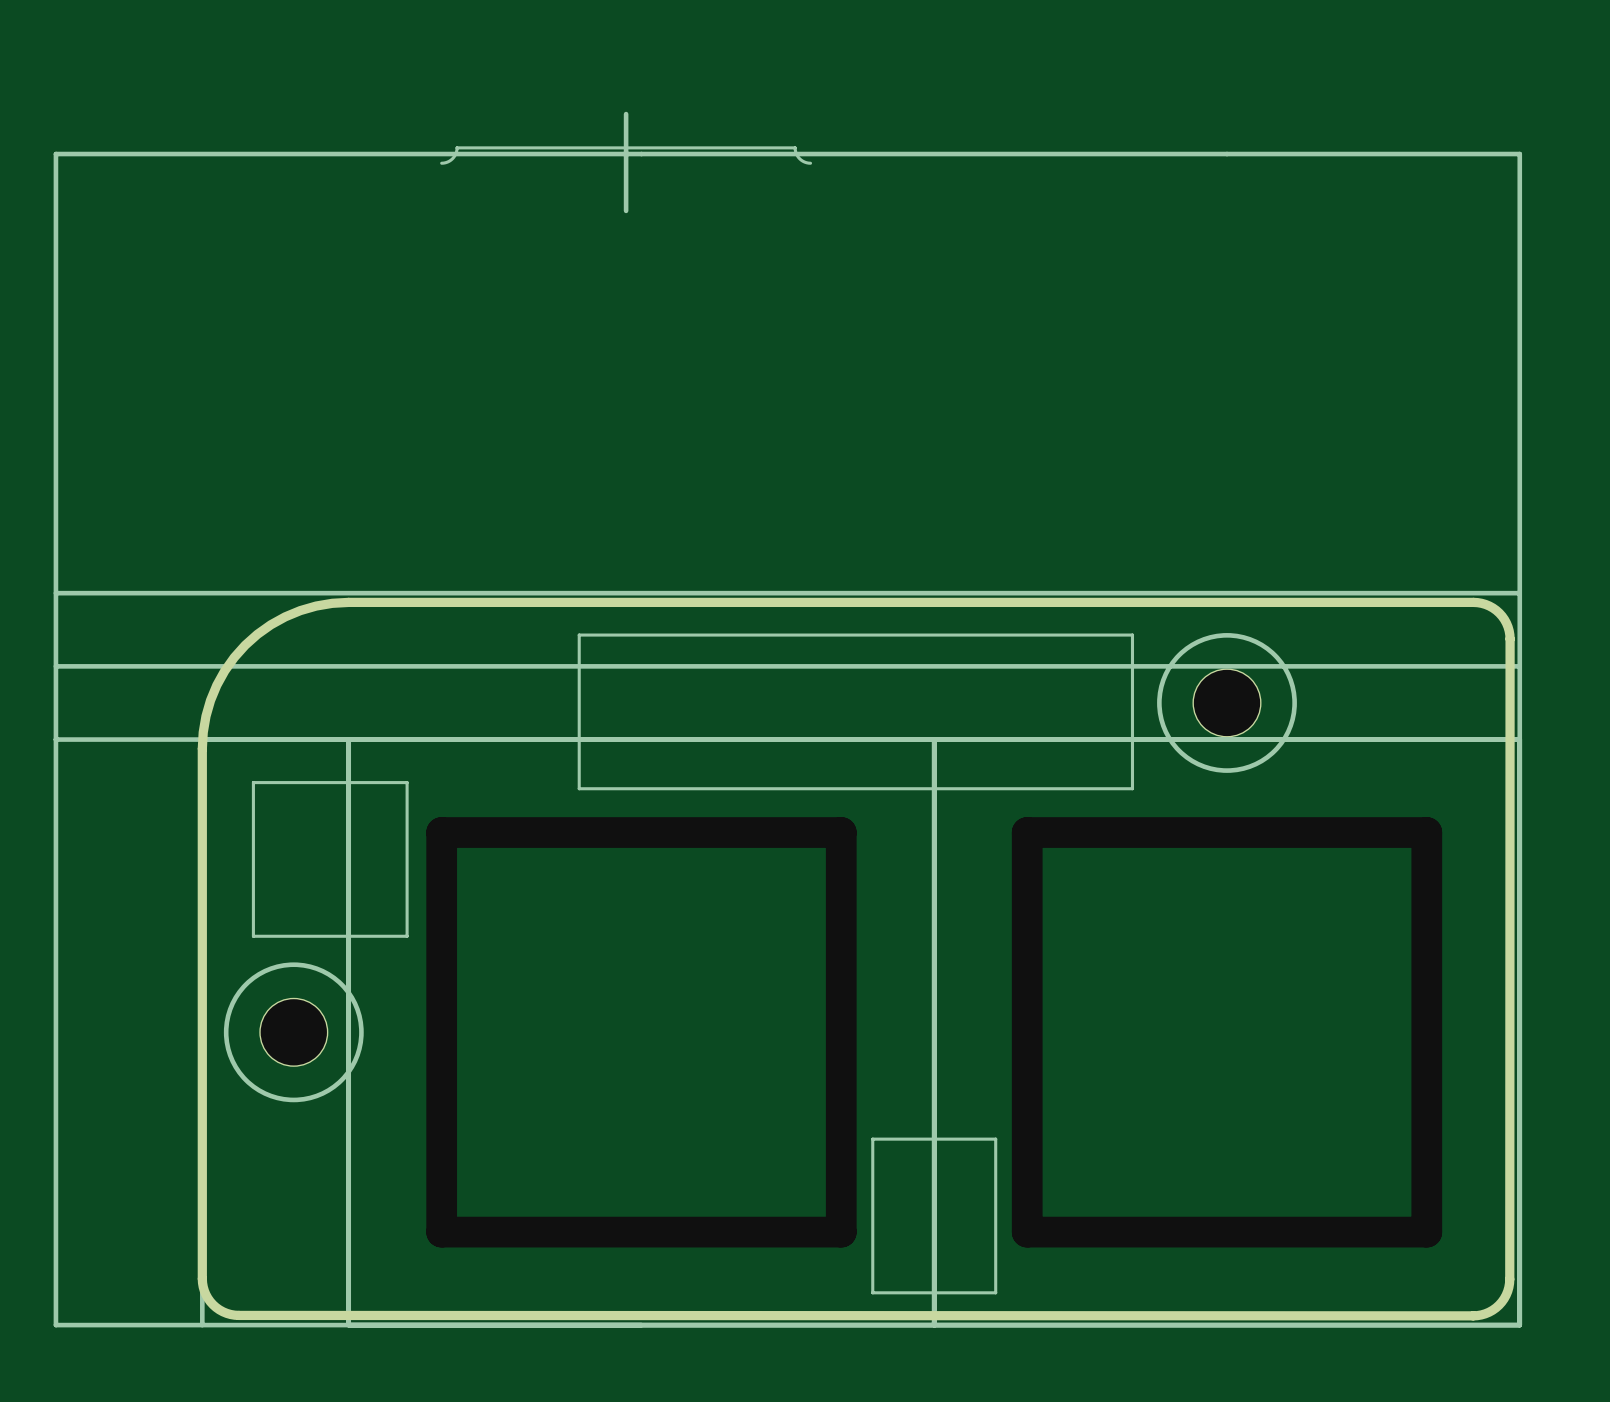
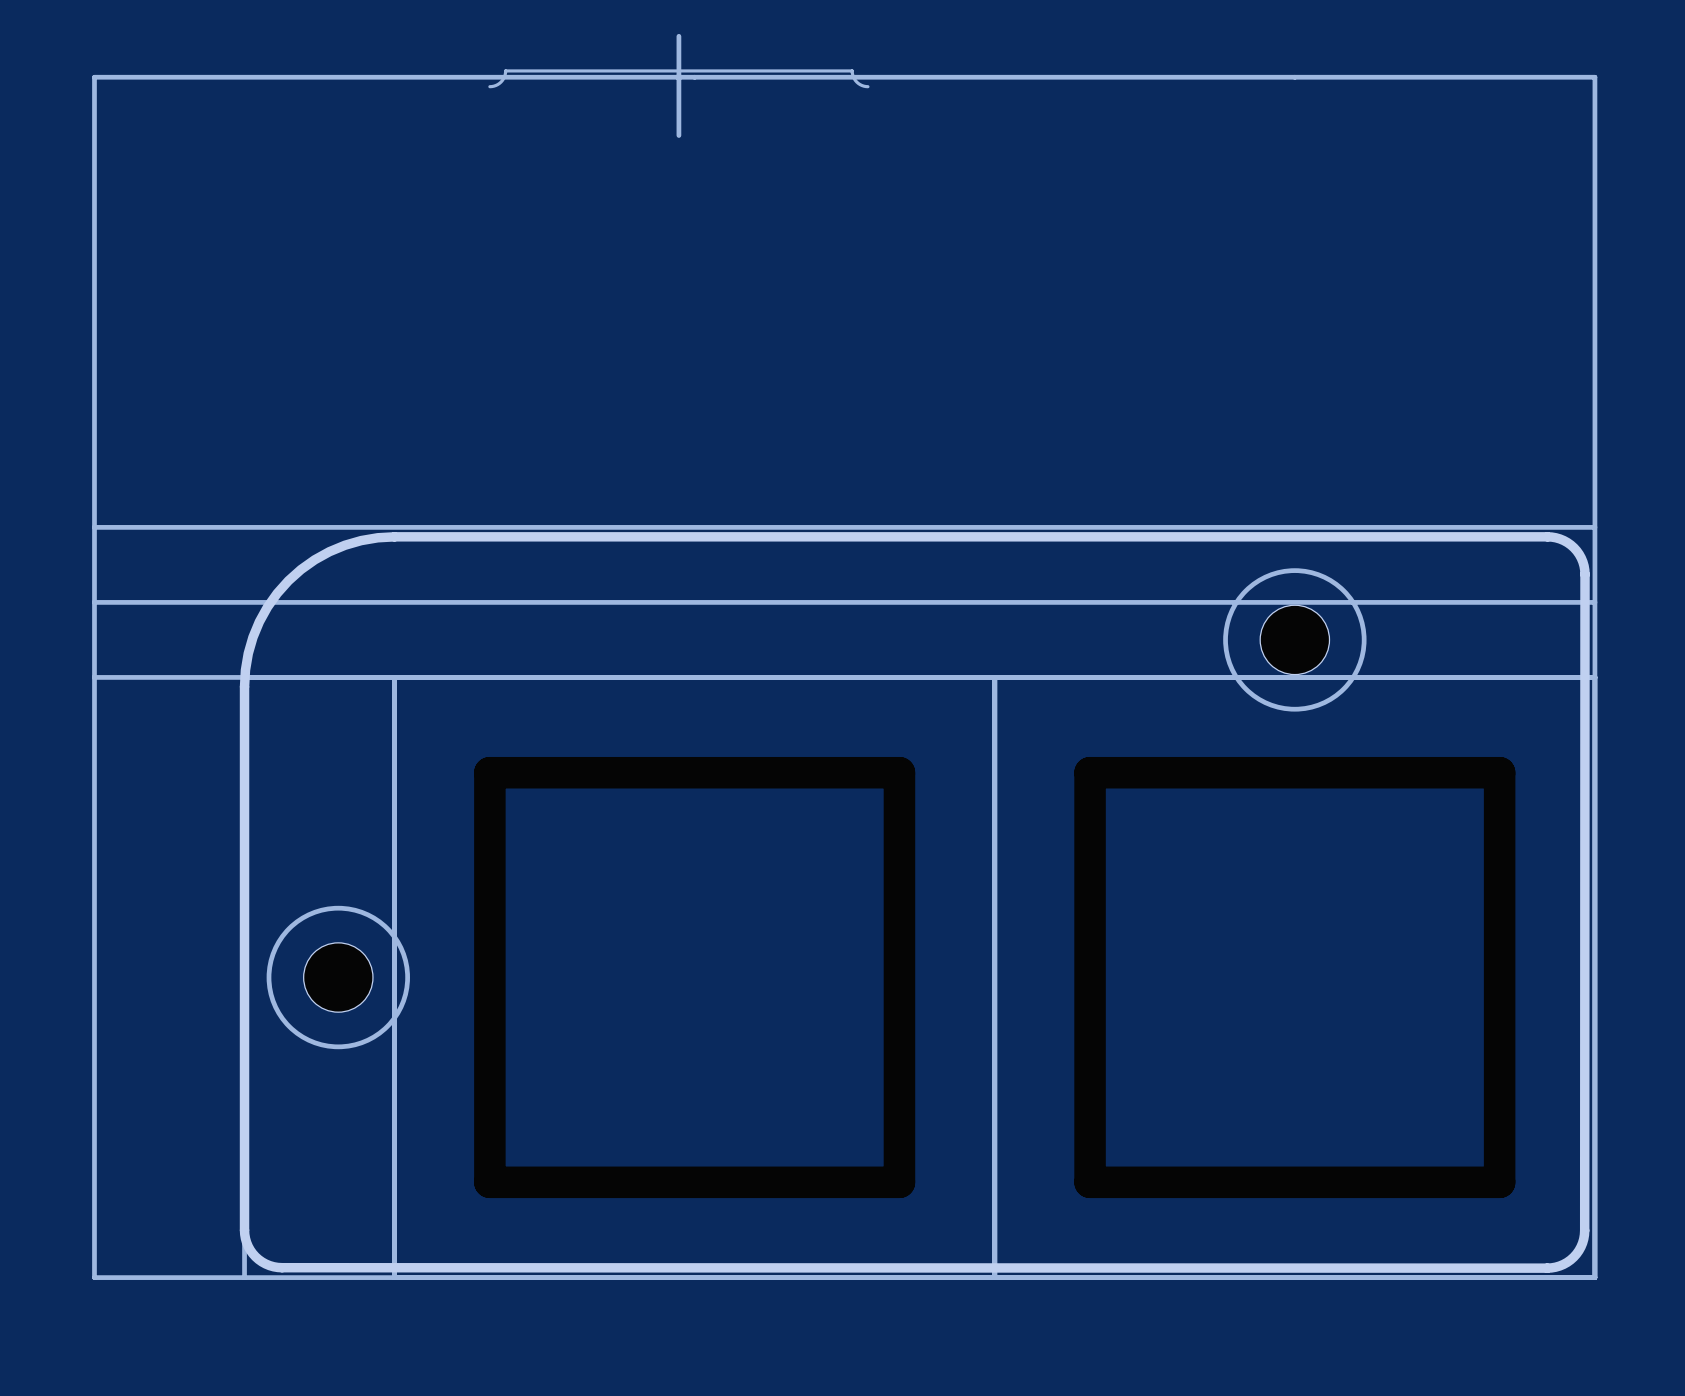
line: (579, 635) (1132, 635) (1132, 788) (579, 788) (579, 635) -> none
line: (253, 782) (407, 782) (407, 936) (253, 936) (253, 782) -> none
line: (872, 1139) (995, 1139) (995, 1292) (872, 1292) (872, 1139) -> none

